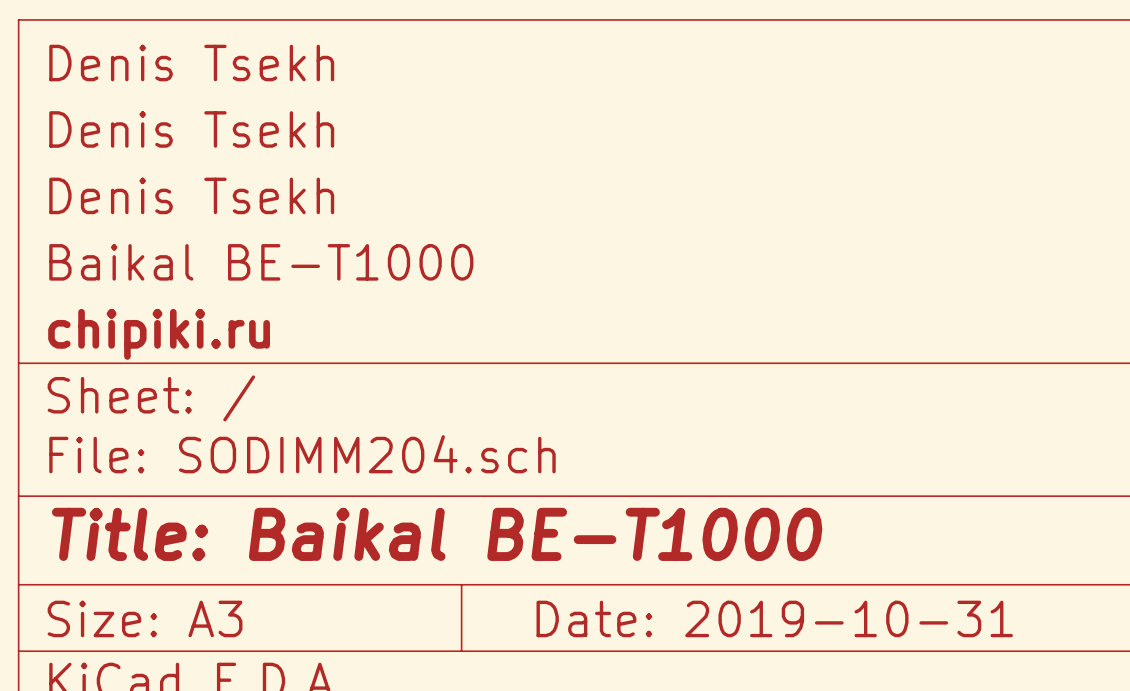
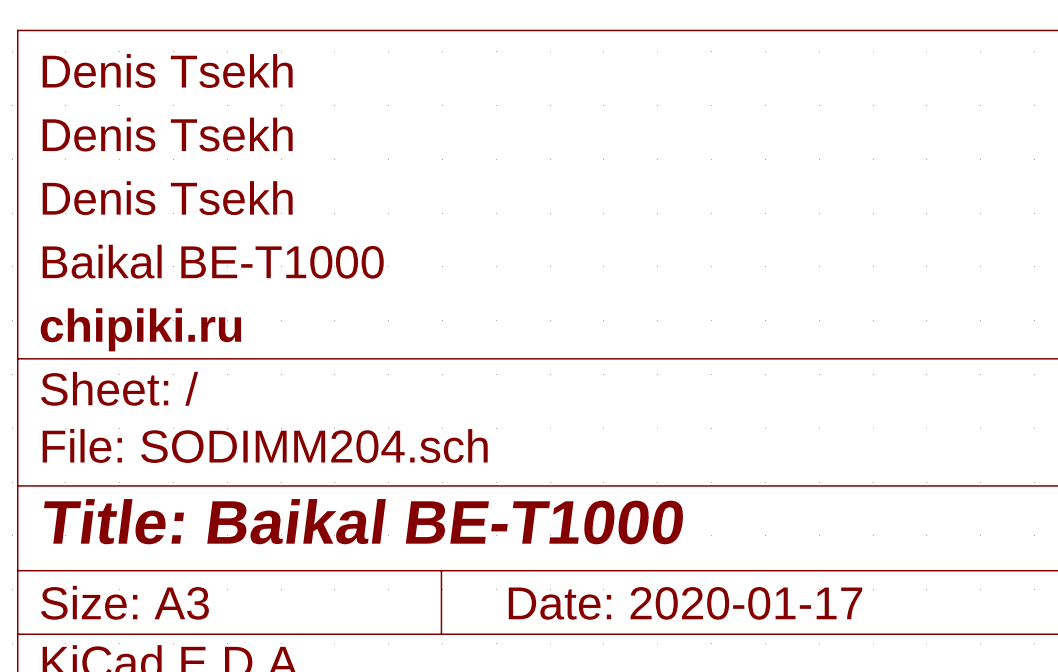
title block: Date: 2019-10-31 (774, 618) -> Date: 2020-01-17 (685, 603)

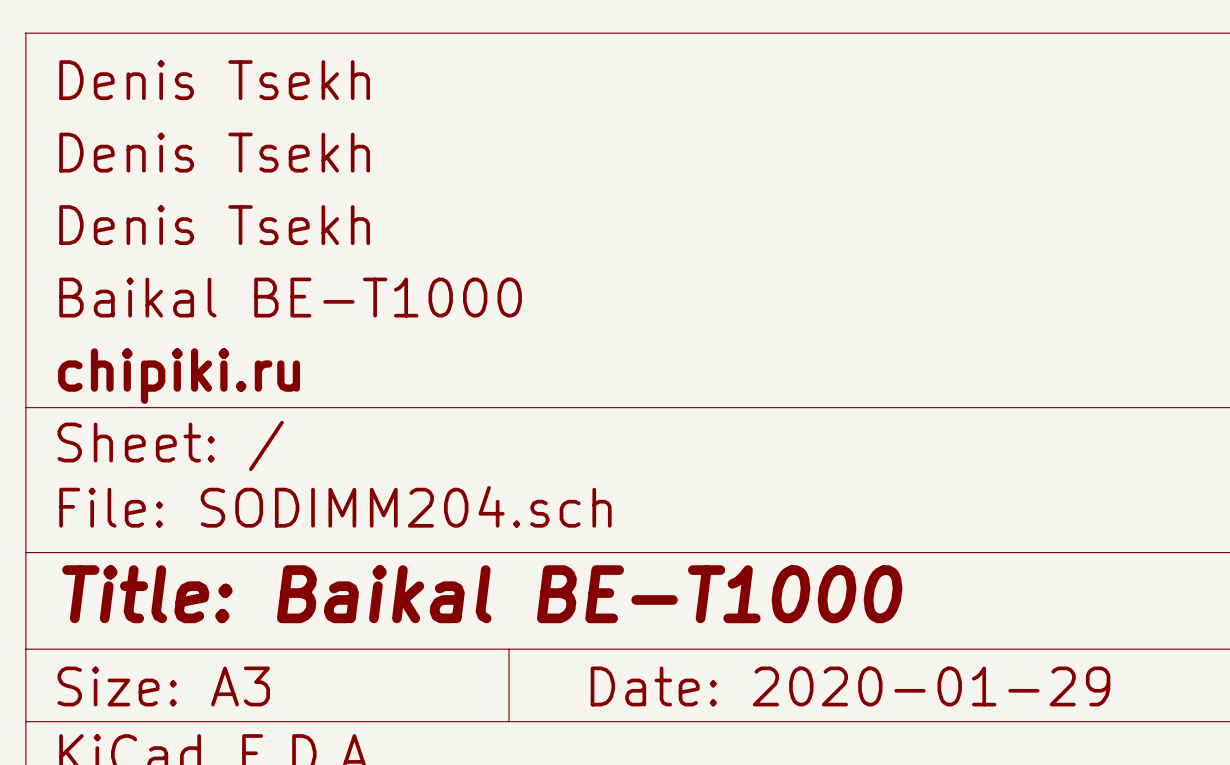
title block: Date: 2020-01-17 (685, 603) -> Date: 2020-01-29 (850, 686)

